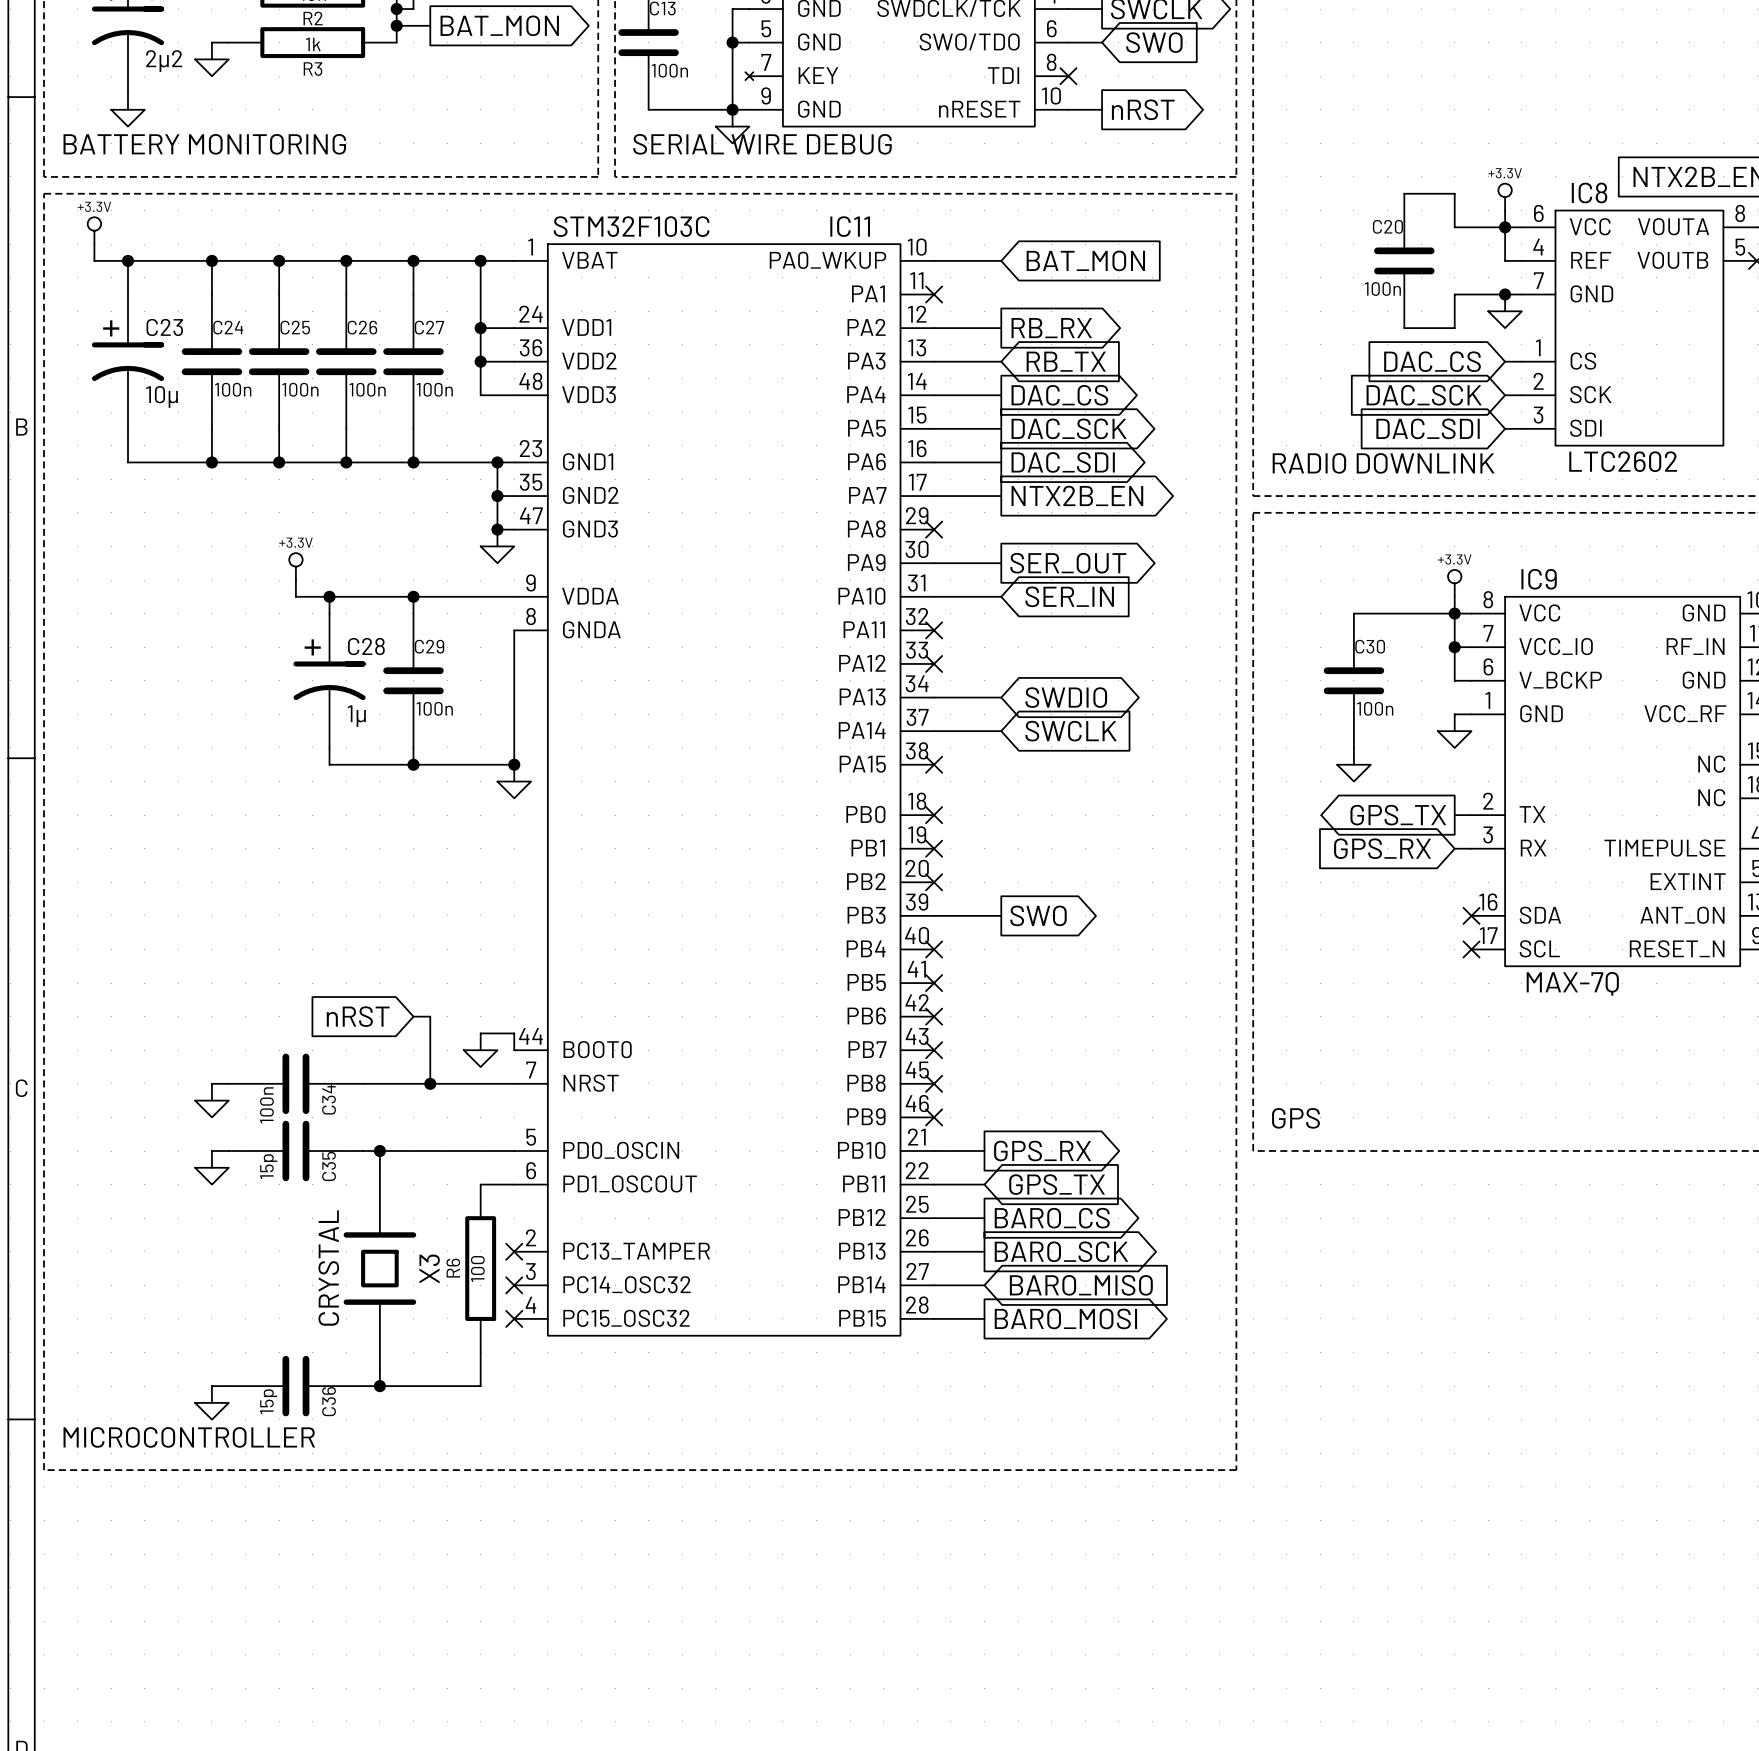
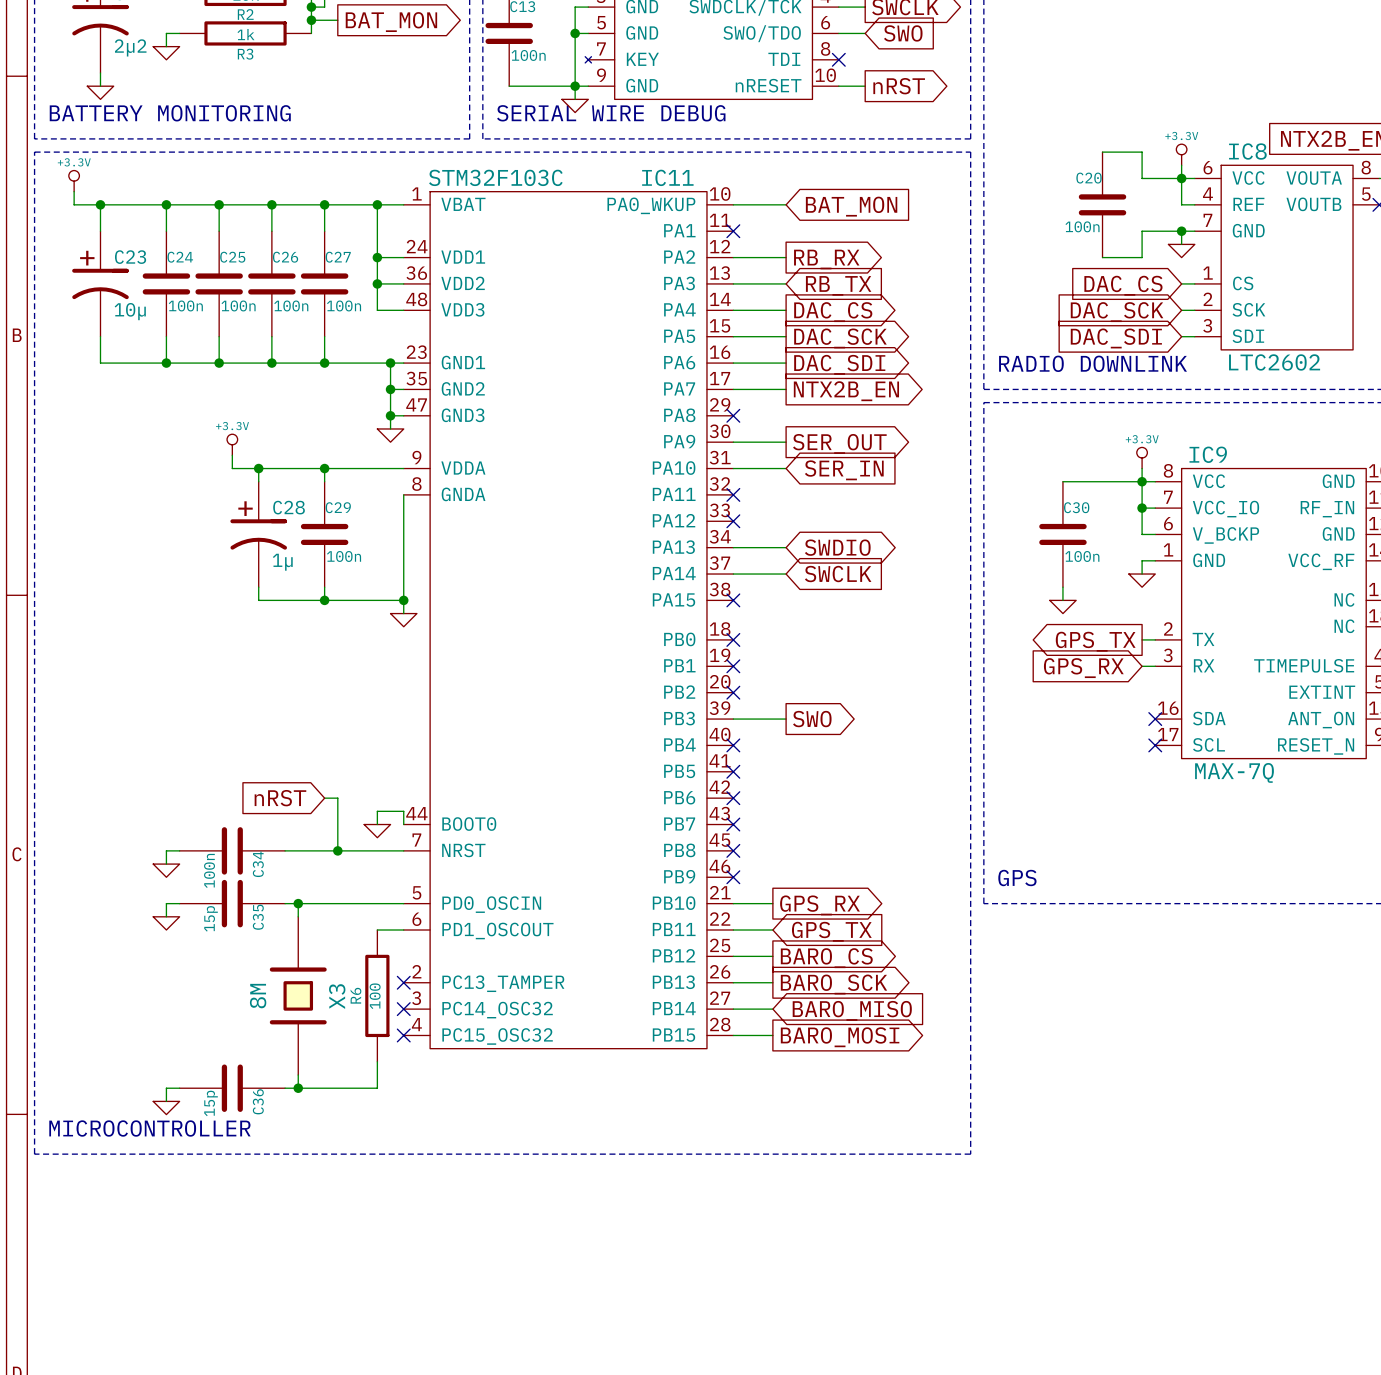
X3 value: CRYSTAL (328, 1268) -> 8M (258, 996)

